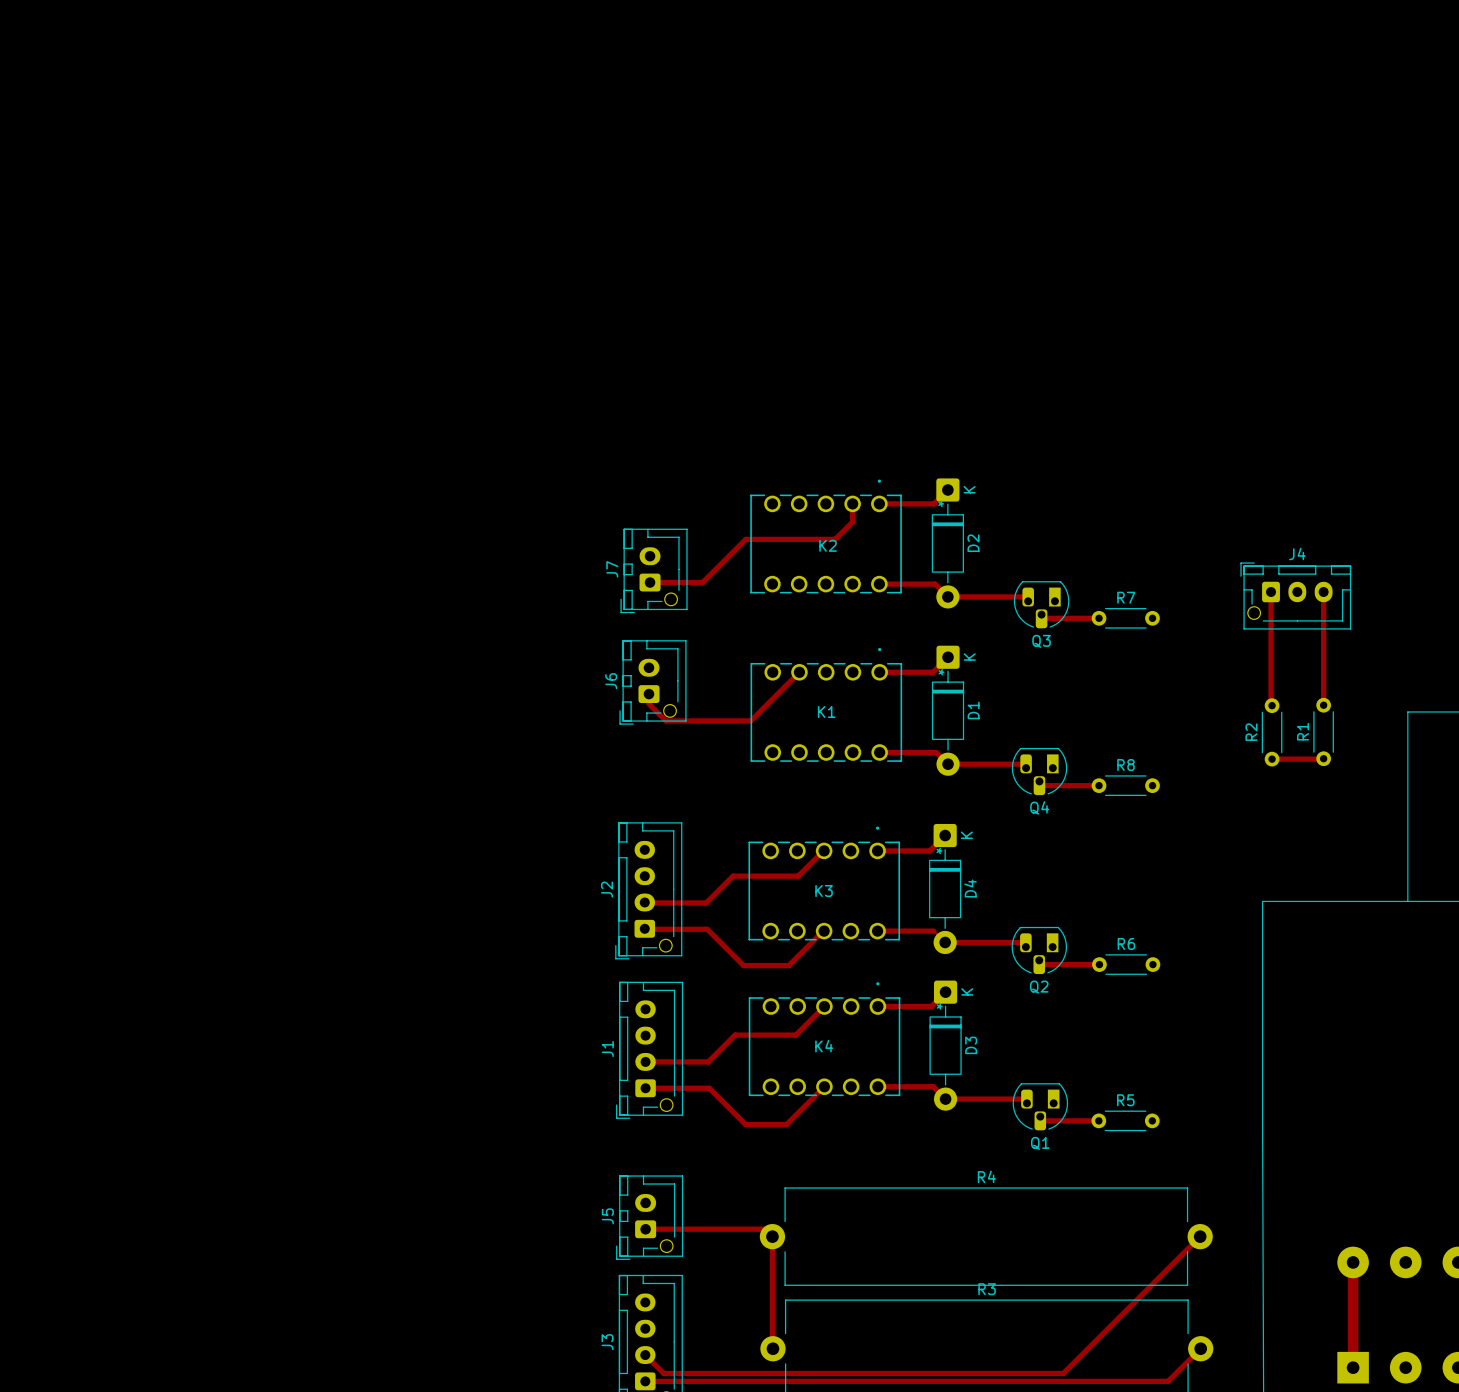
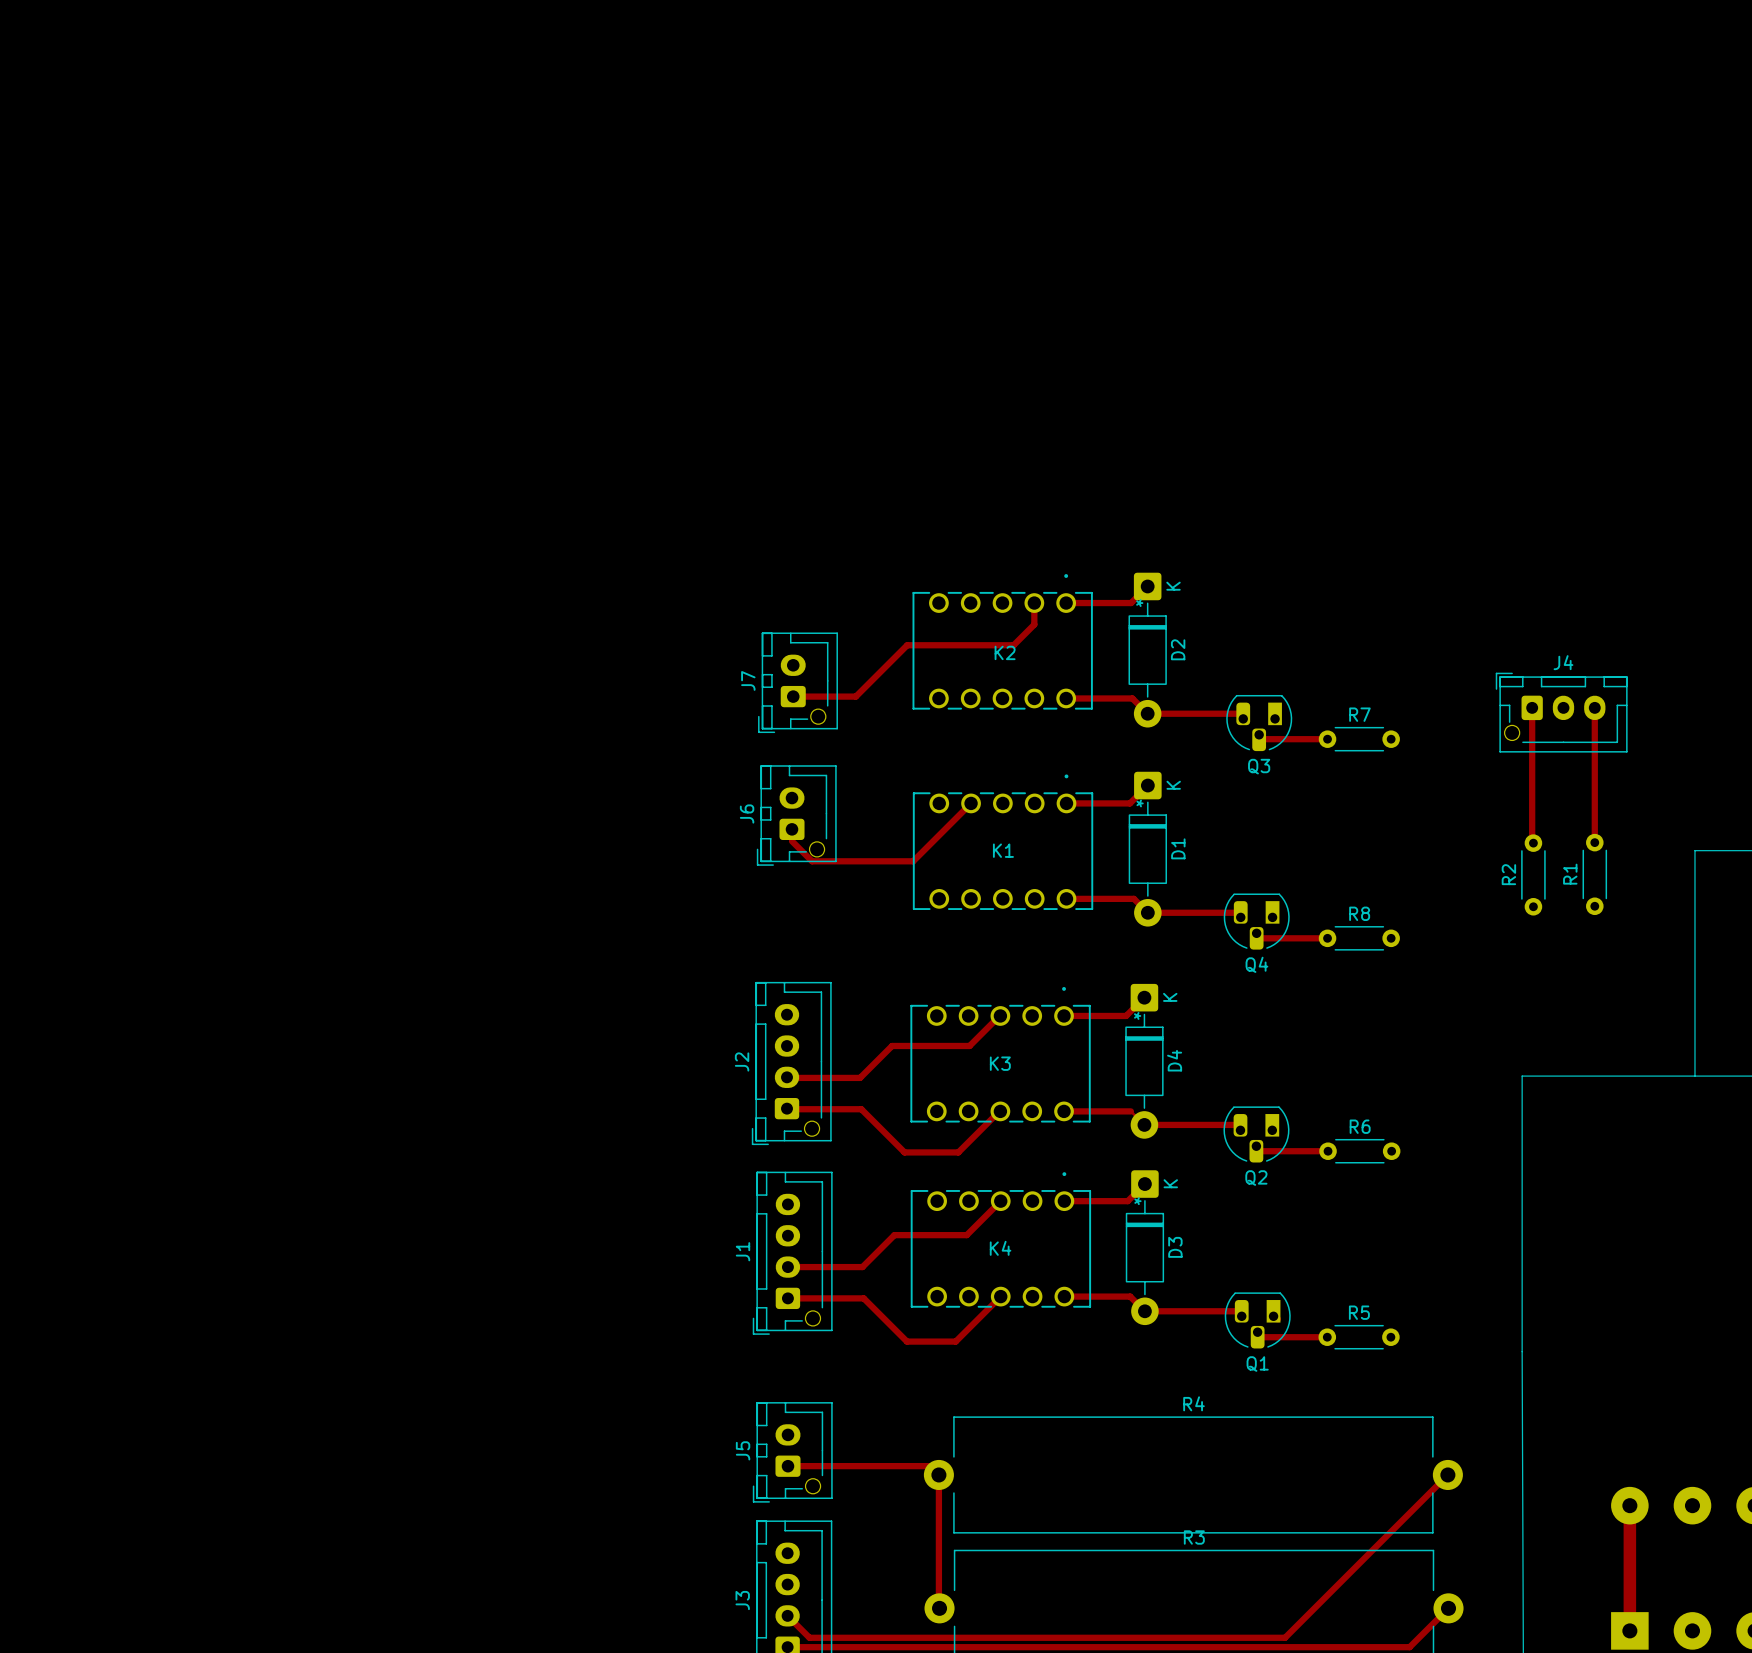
track: (1272, 759) (1324, 759) -> none

